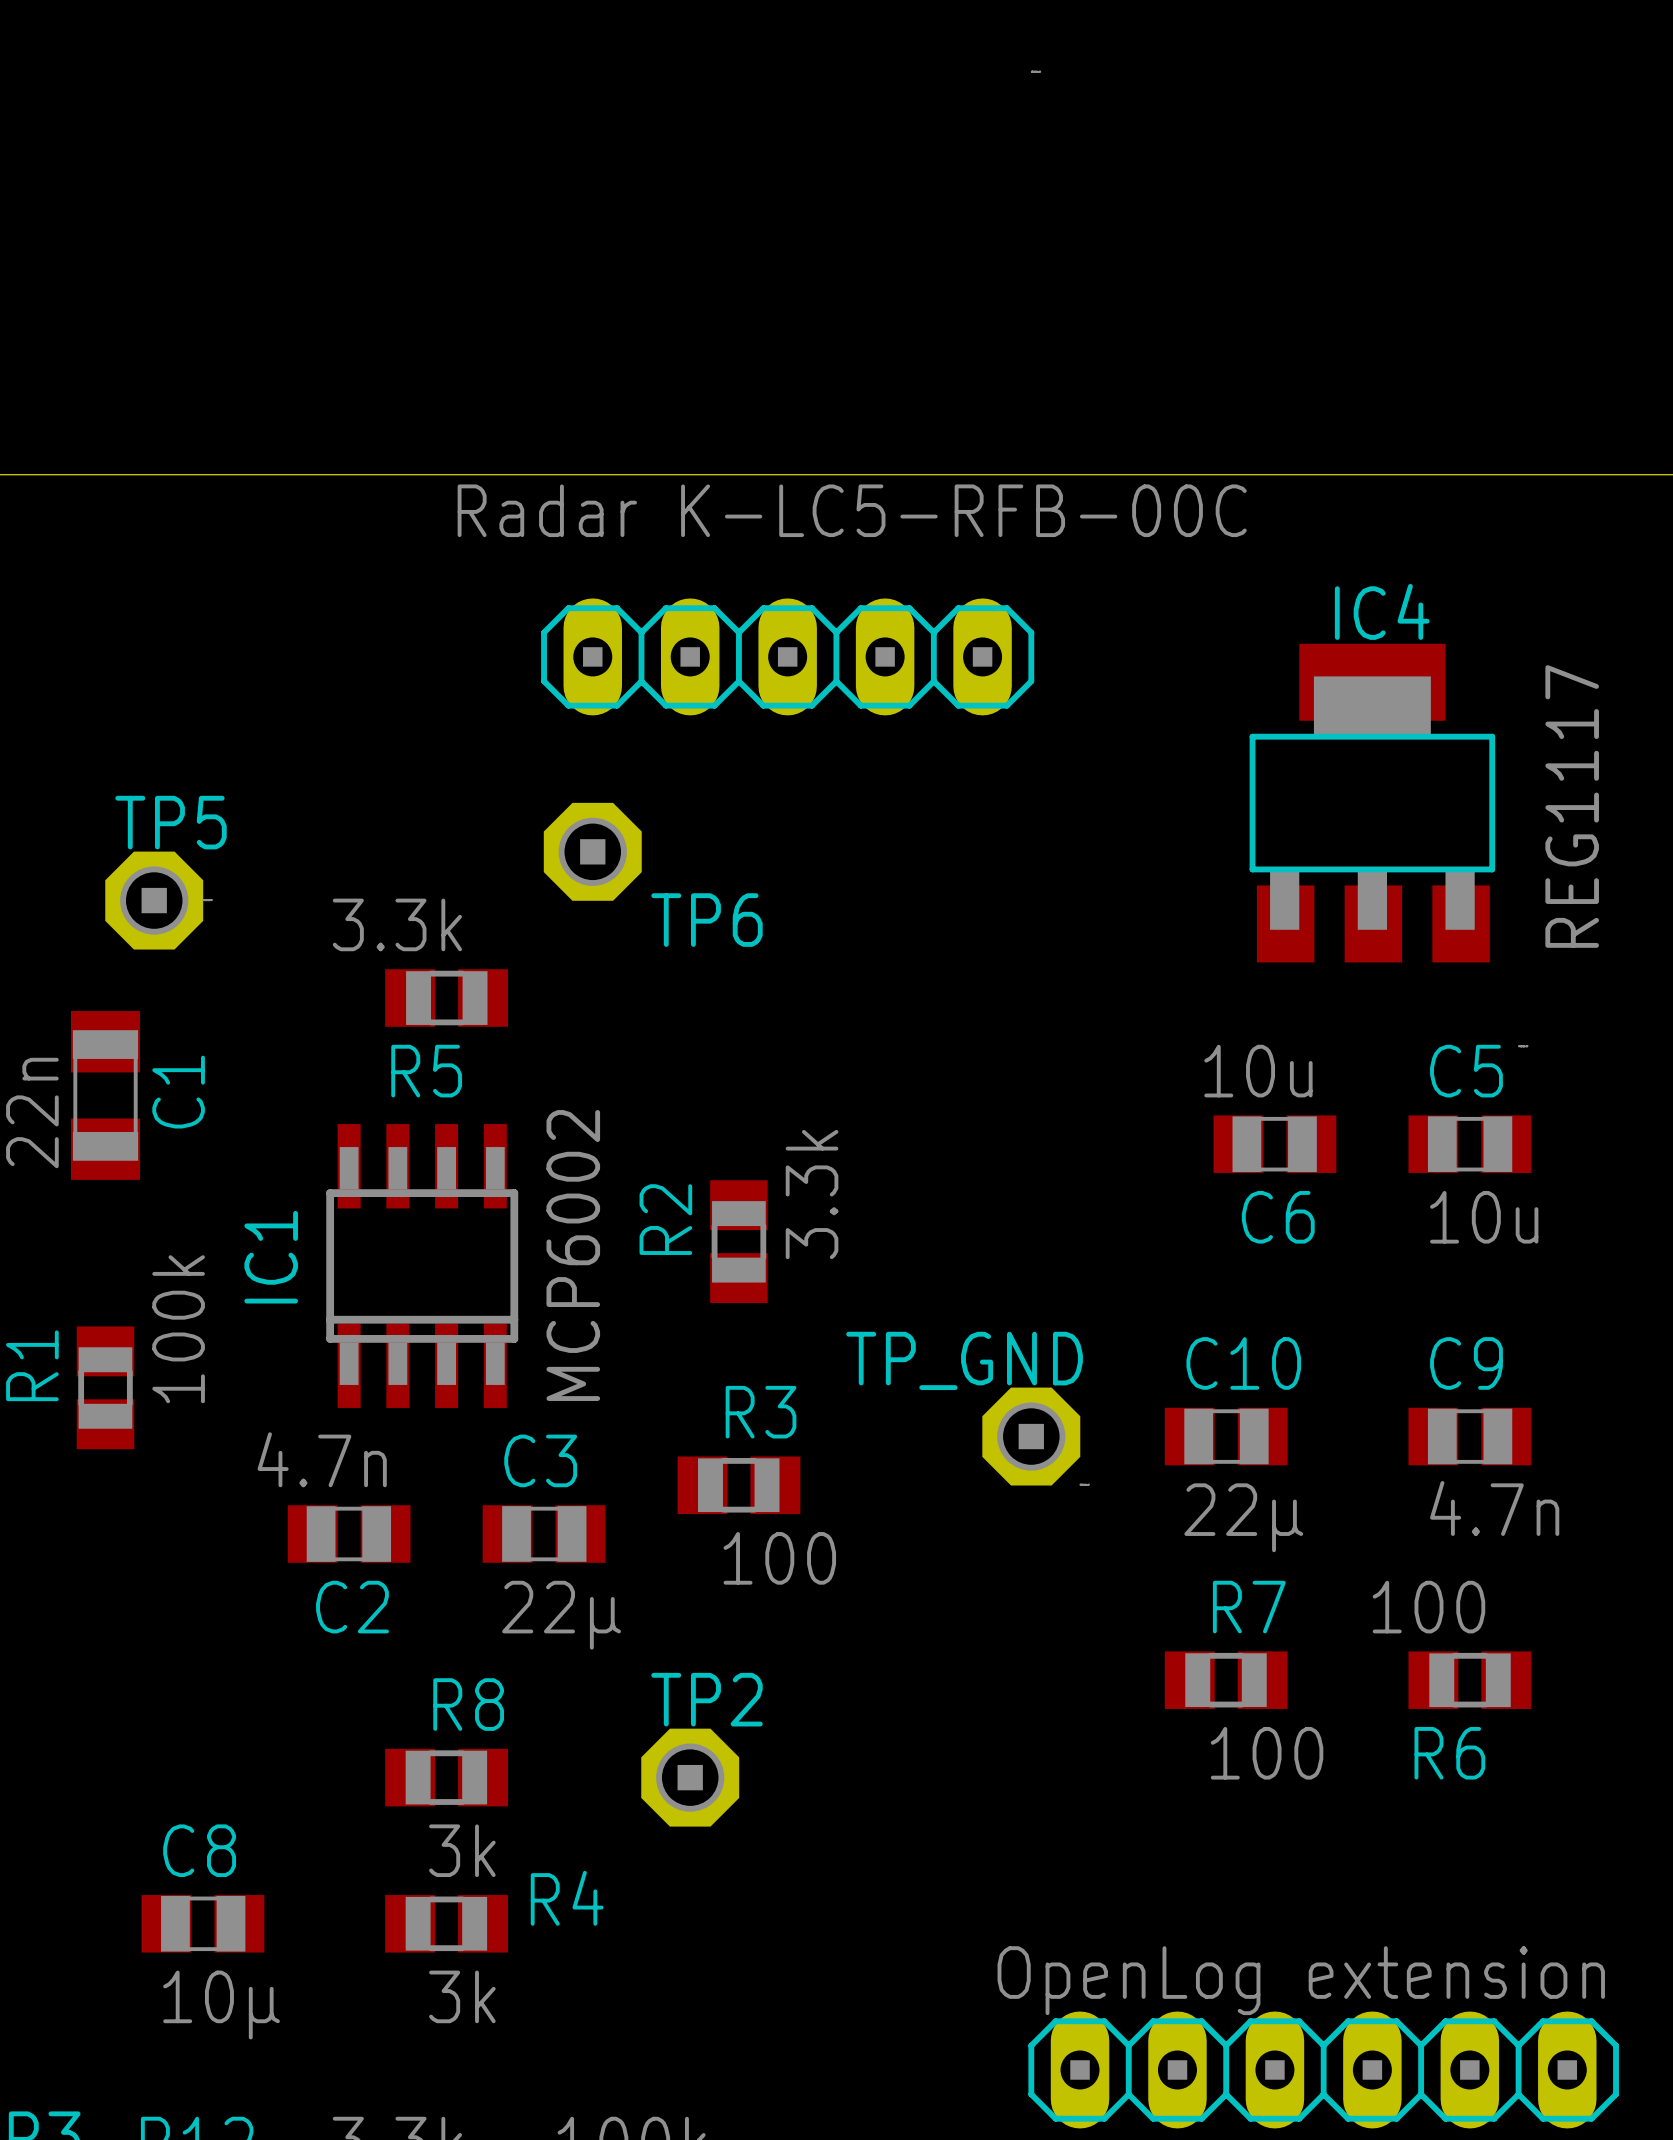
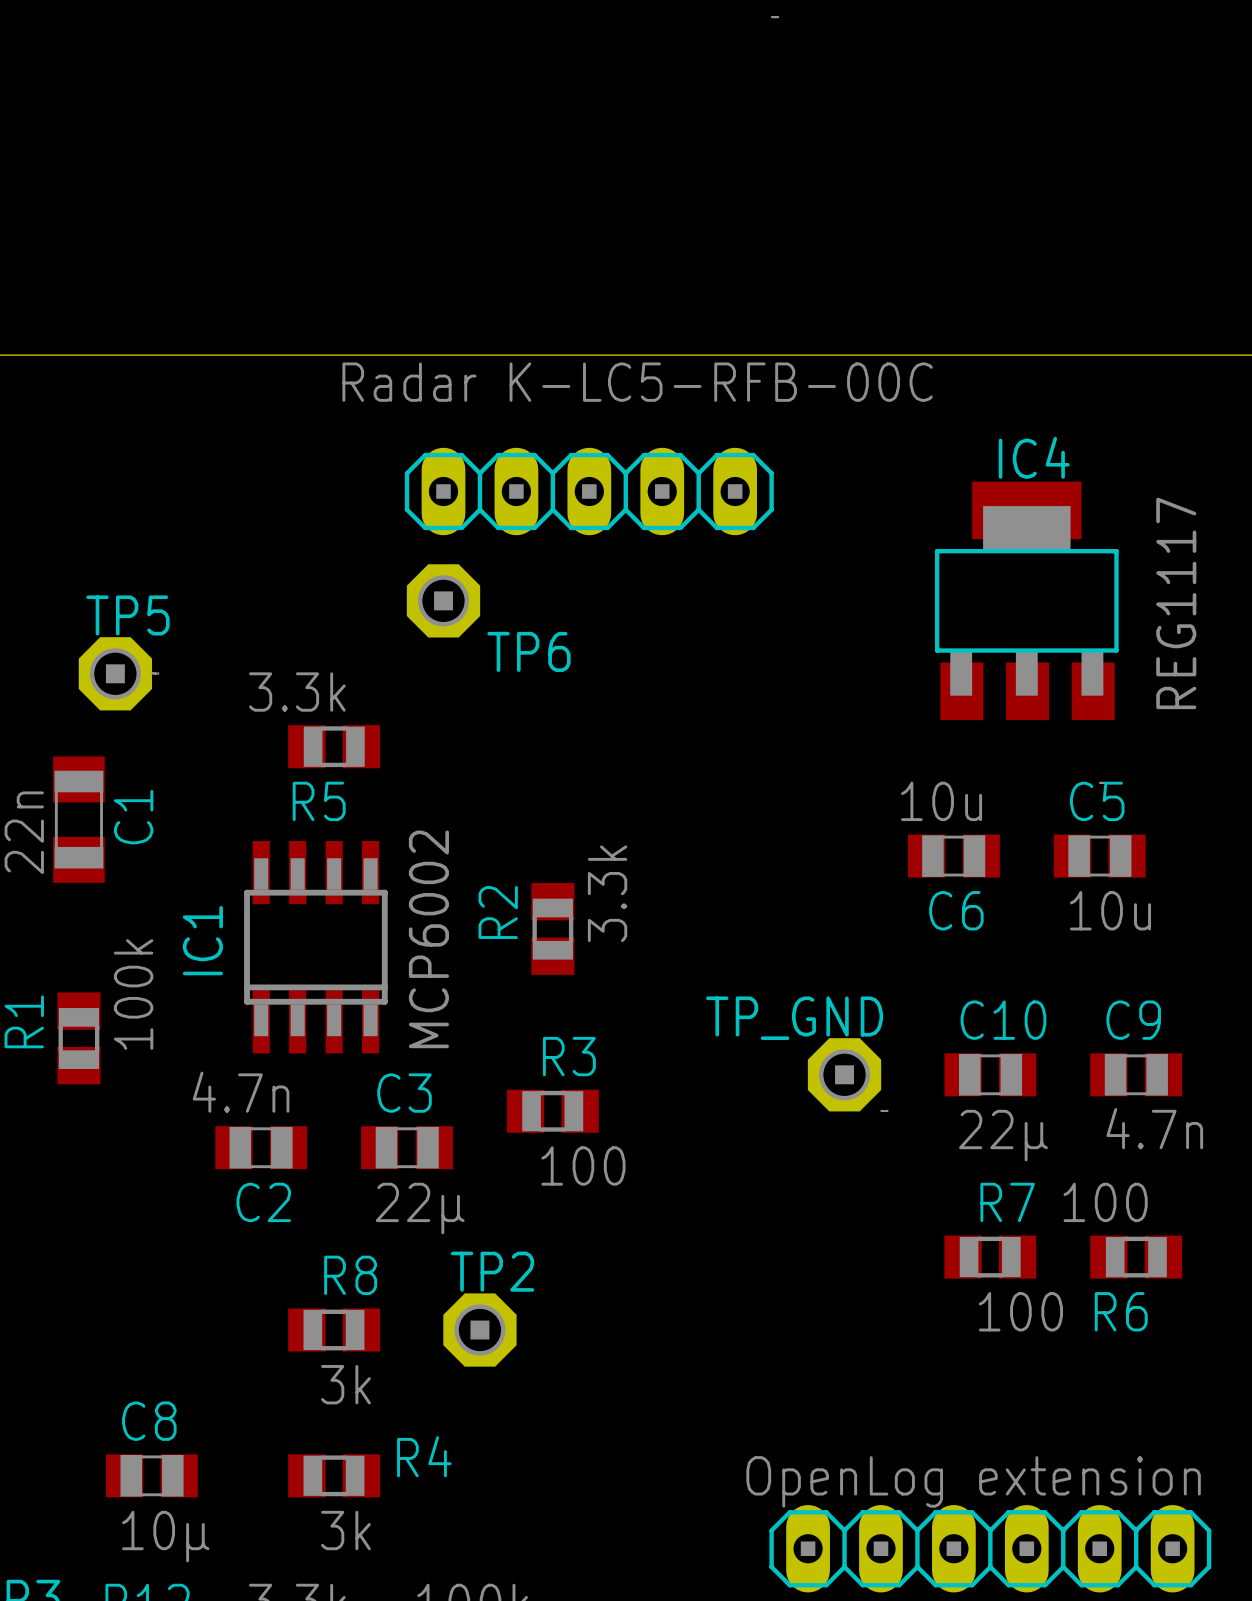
TP6 position: (592, 851) -> (443, 600)
TP_GND position: (1031, 1436) -> (844, 1074)
C10 position: (1226, 1436) -> (990, 1074)
C9 position: (1469, 1436) -> (1136, 1074)
R7 position: (1226, 1680) -> (990, 1257)
R6 position: (1469, 1680) -> (1136, 1257)
TP2 position: (690, 1777) -> (479, 1330)
C8 position: (202, 1923) -> (151, 1475)
R4 position: (446, 1923) -> (334, 1475)

